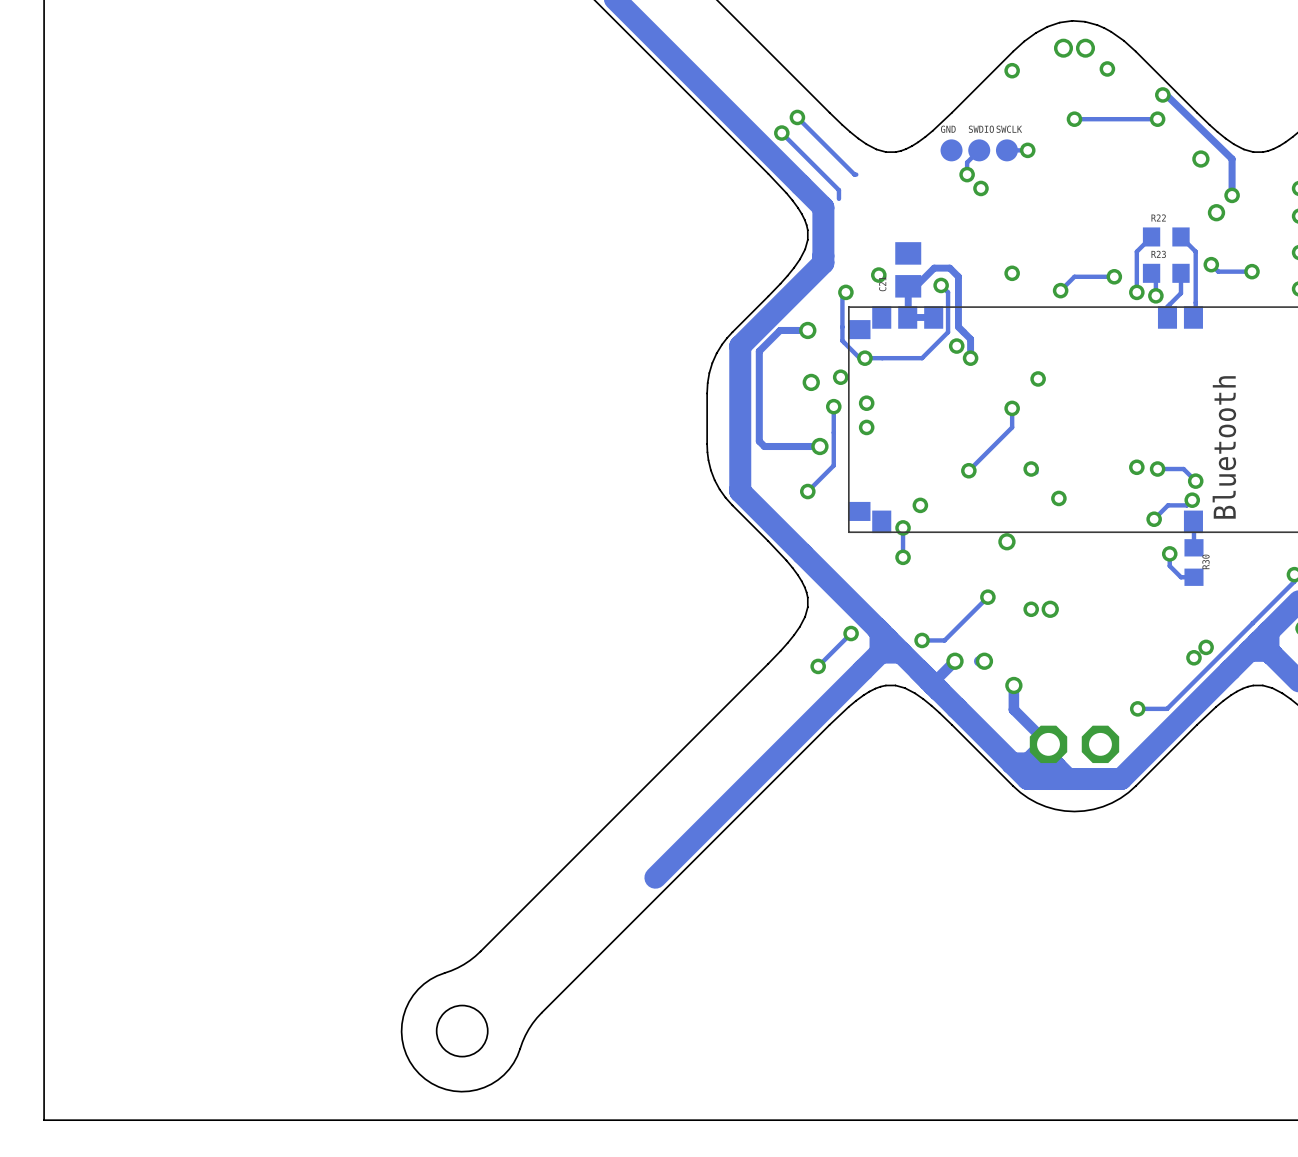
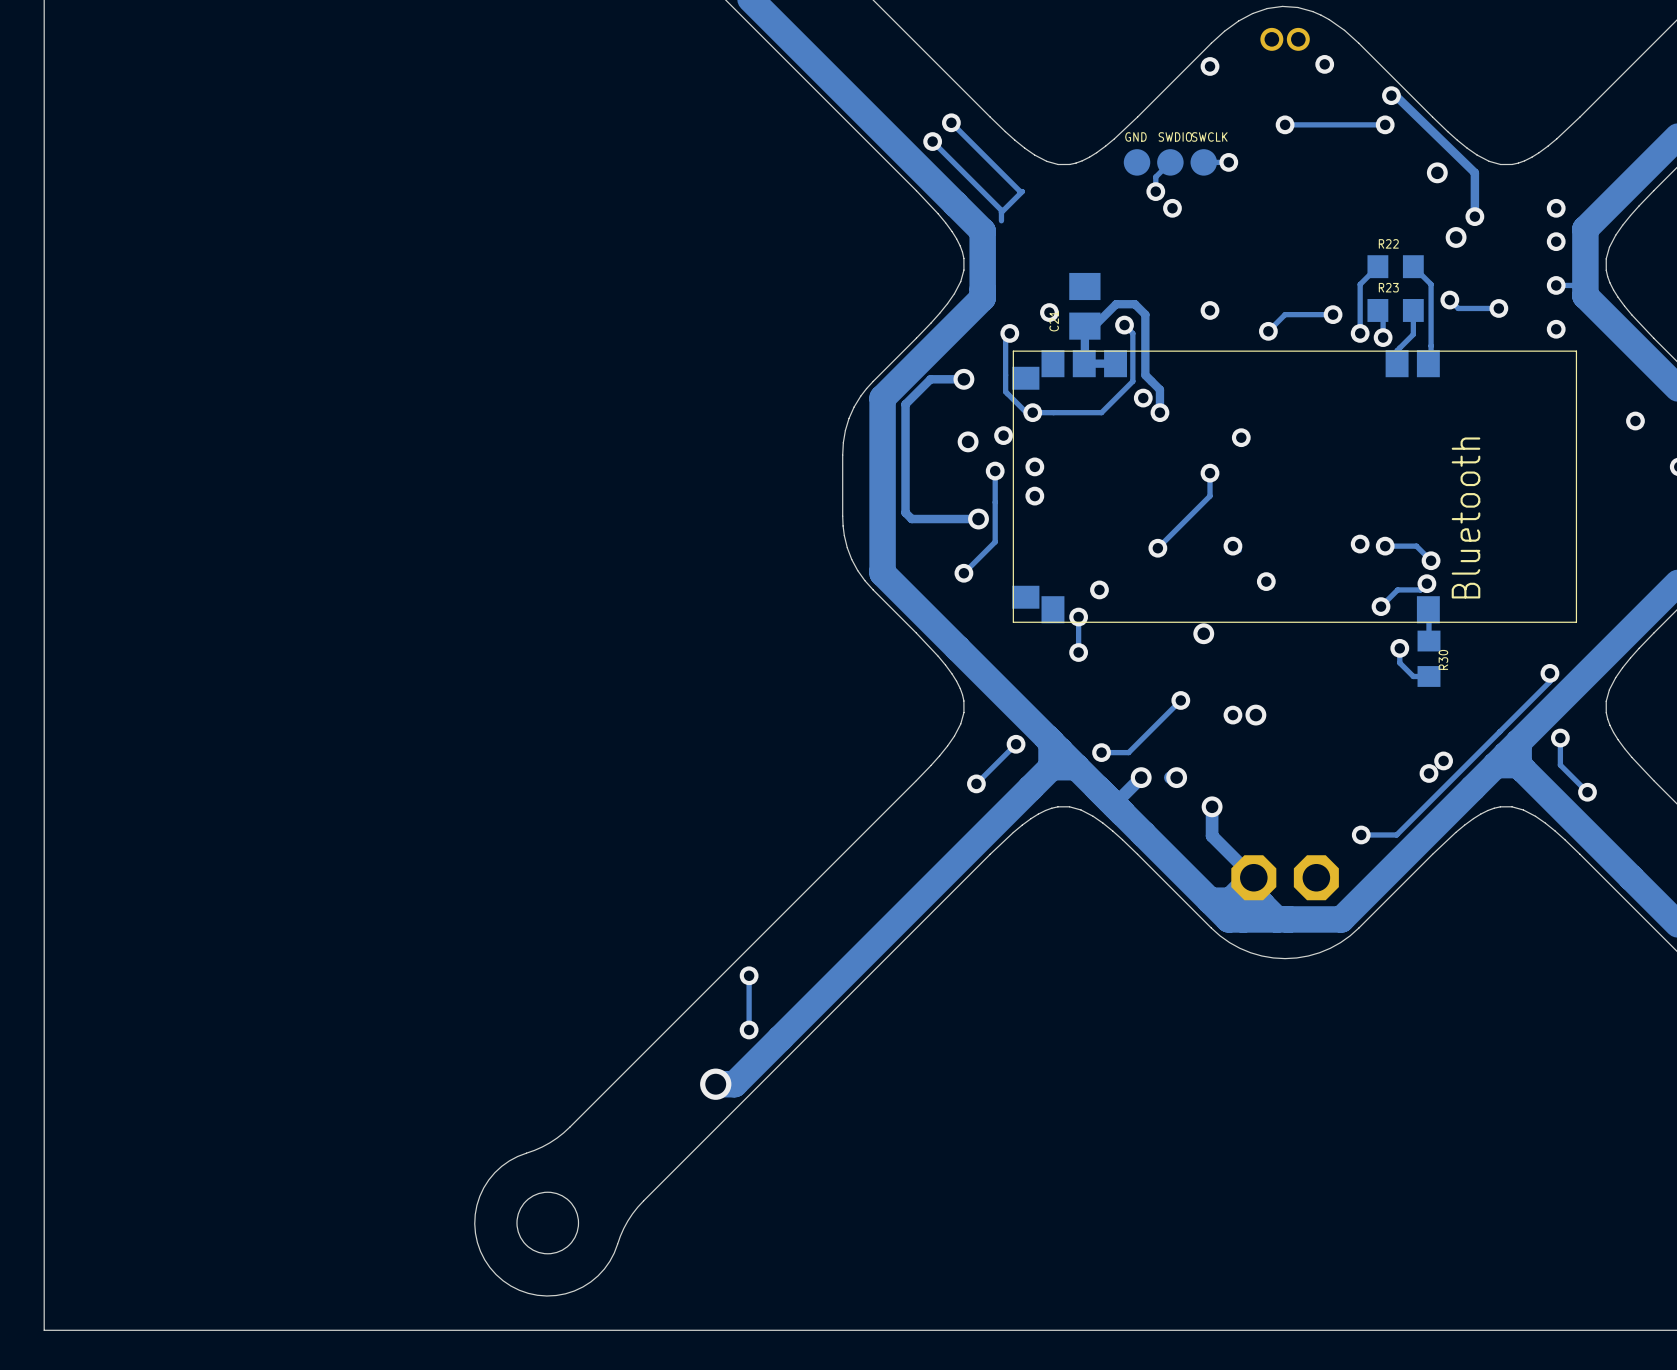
track: none -> (1022, 191) (1001, 212)
track: none -> (749, 975) (749, 1029)
via: none -> (749, 975)
via: none -> (749, 1029)
track: none -> (780, 1038) (734, 1084) (715, 1084)
via: none -> (715, 1084)

